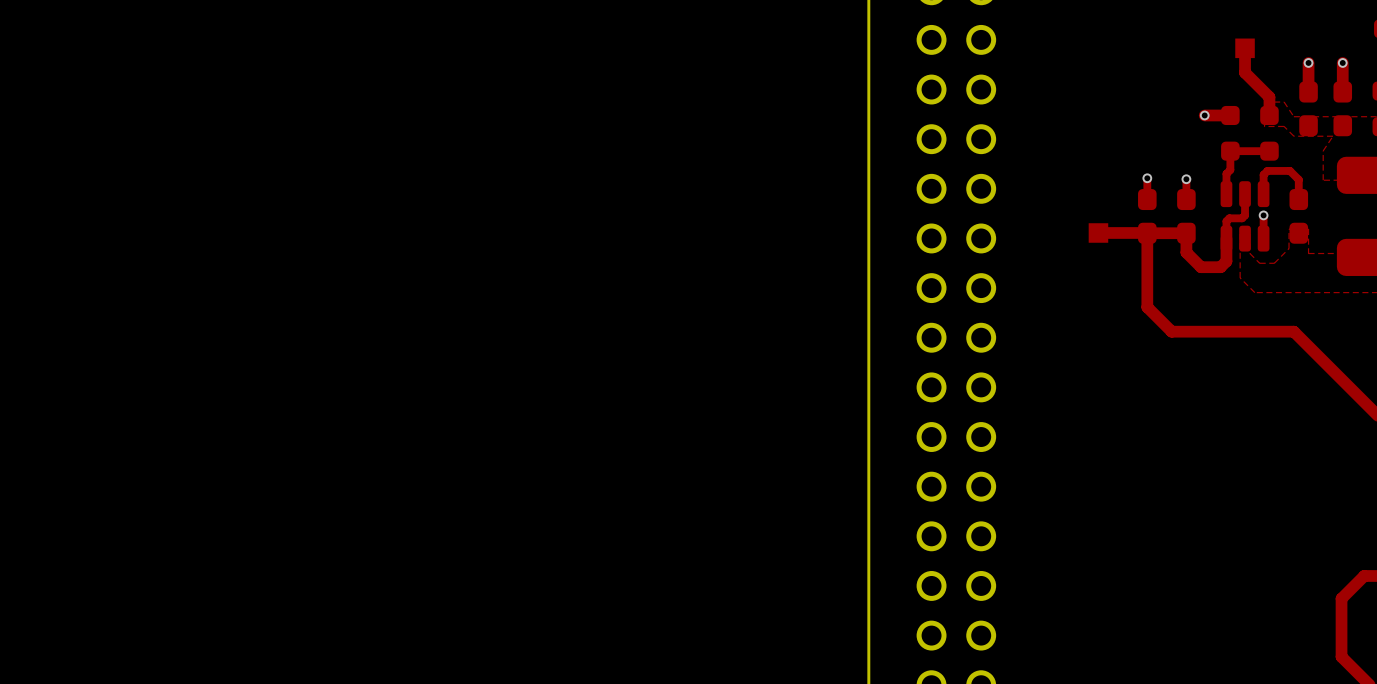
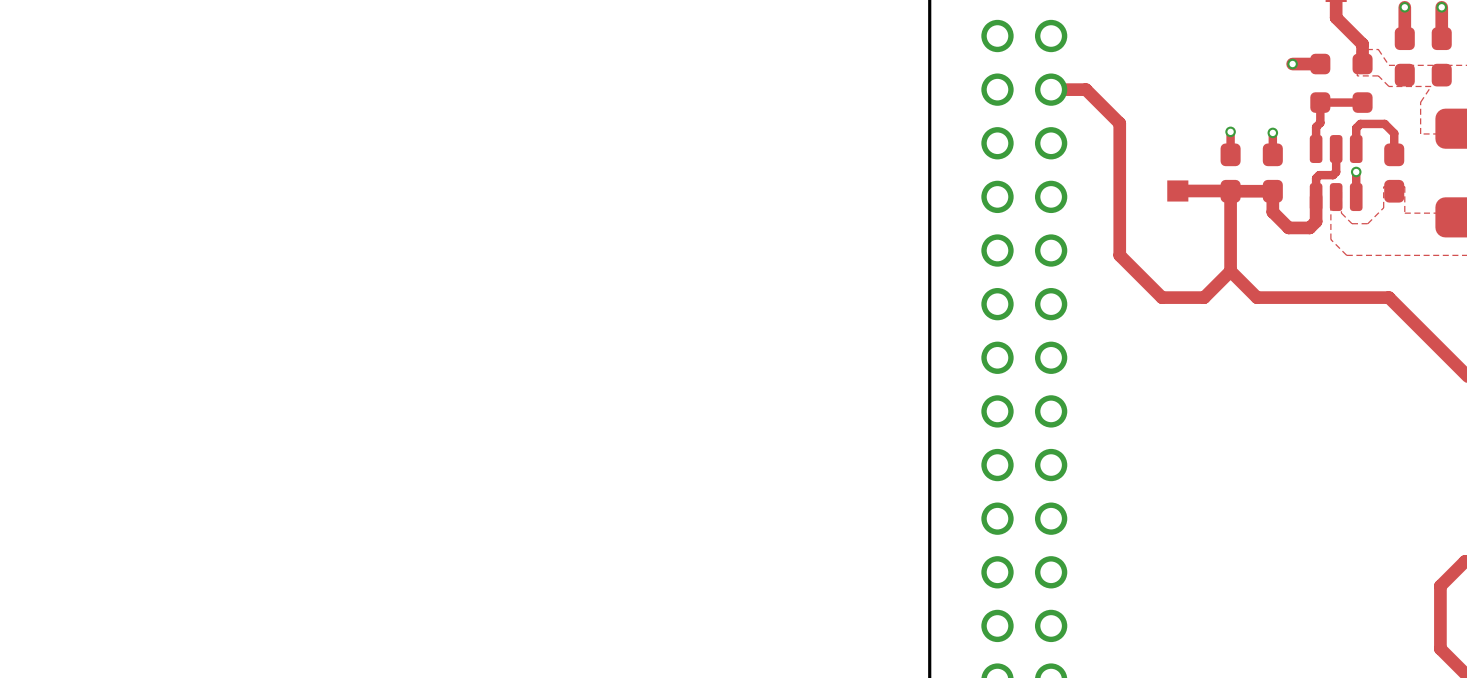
top track: none -> (1051, 89) (1085, 89) (1119, 123) (1119, 255) (1161, 297) (1204, 297) (1230, 271)

